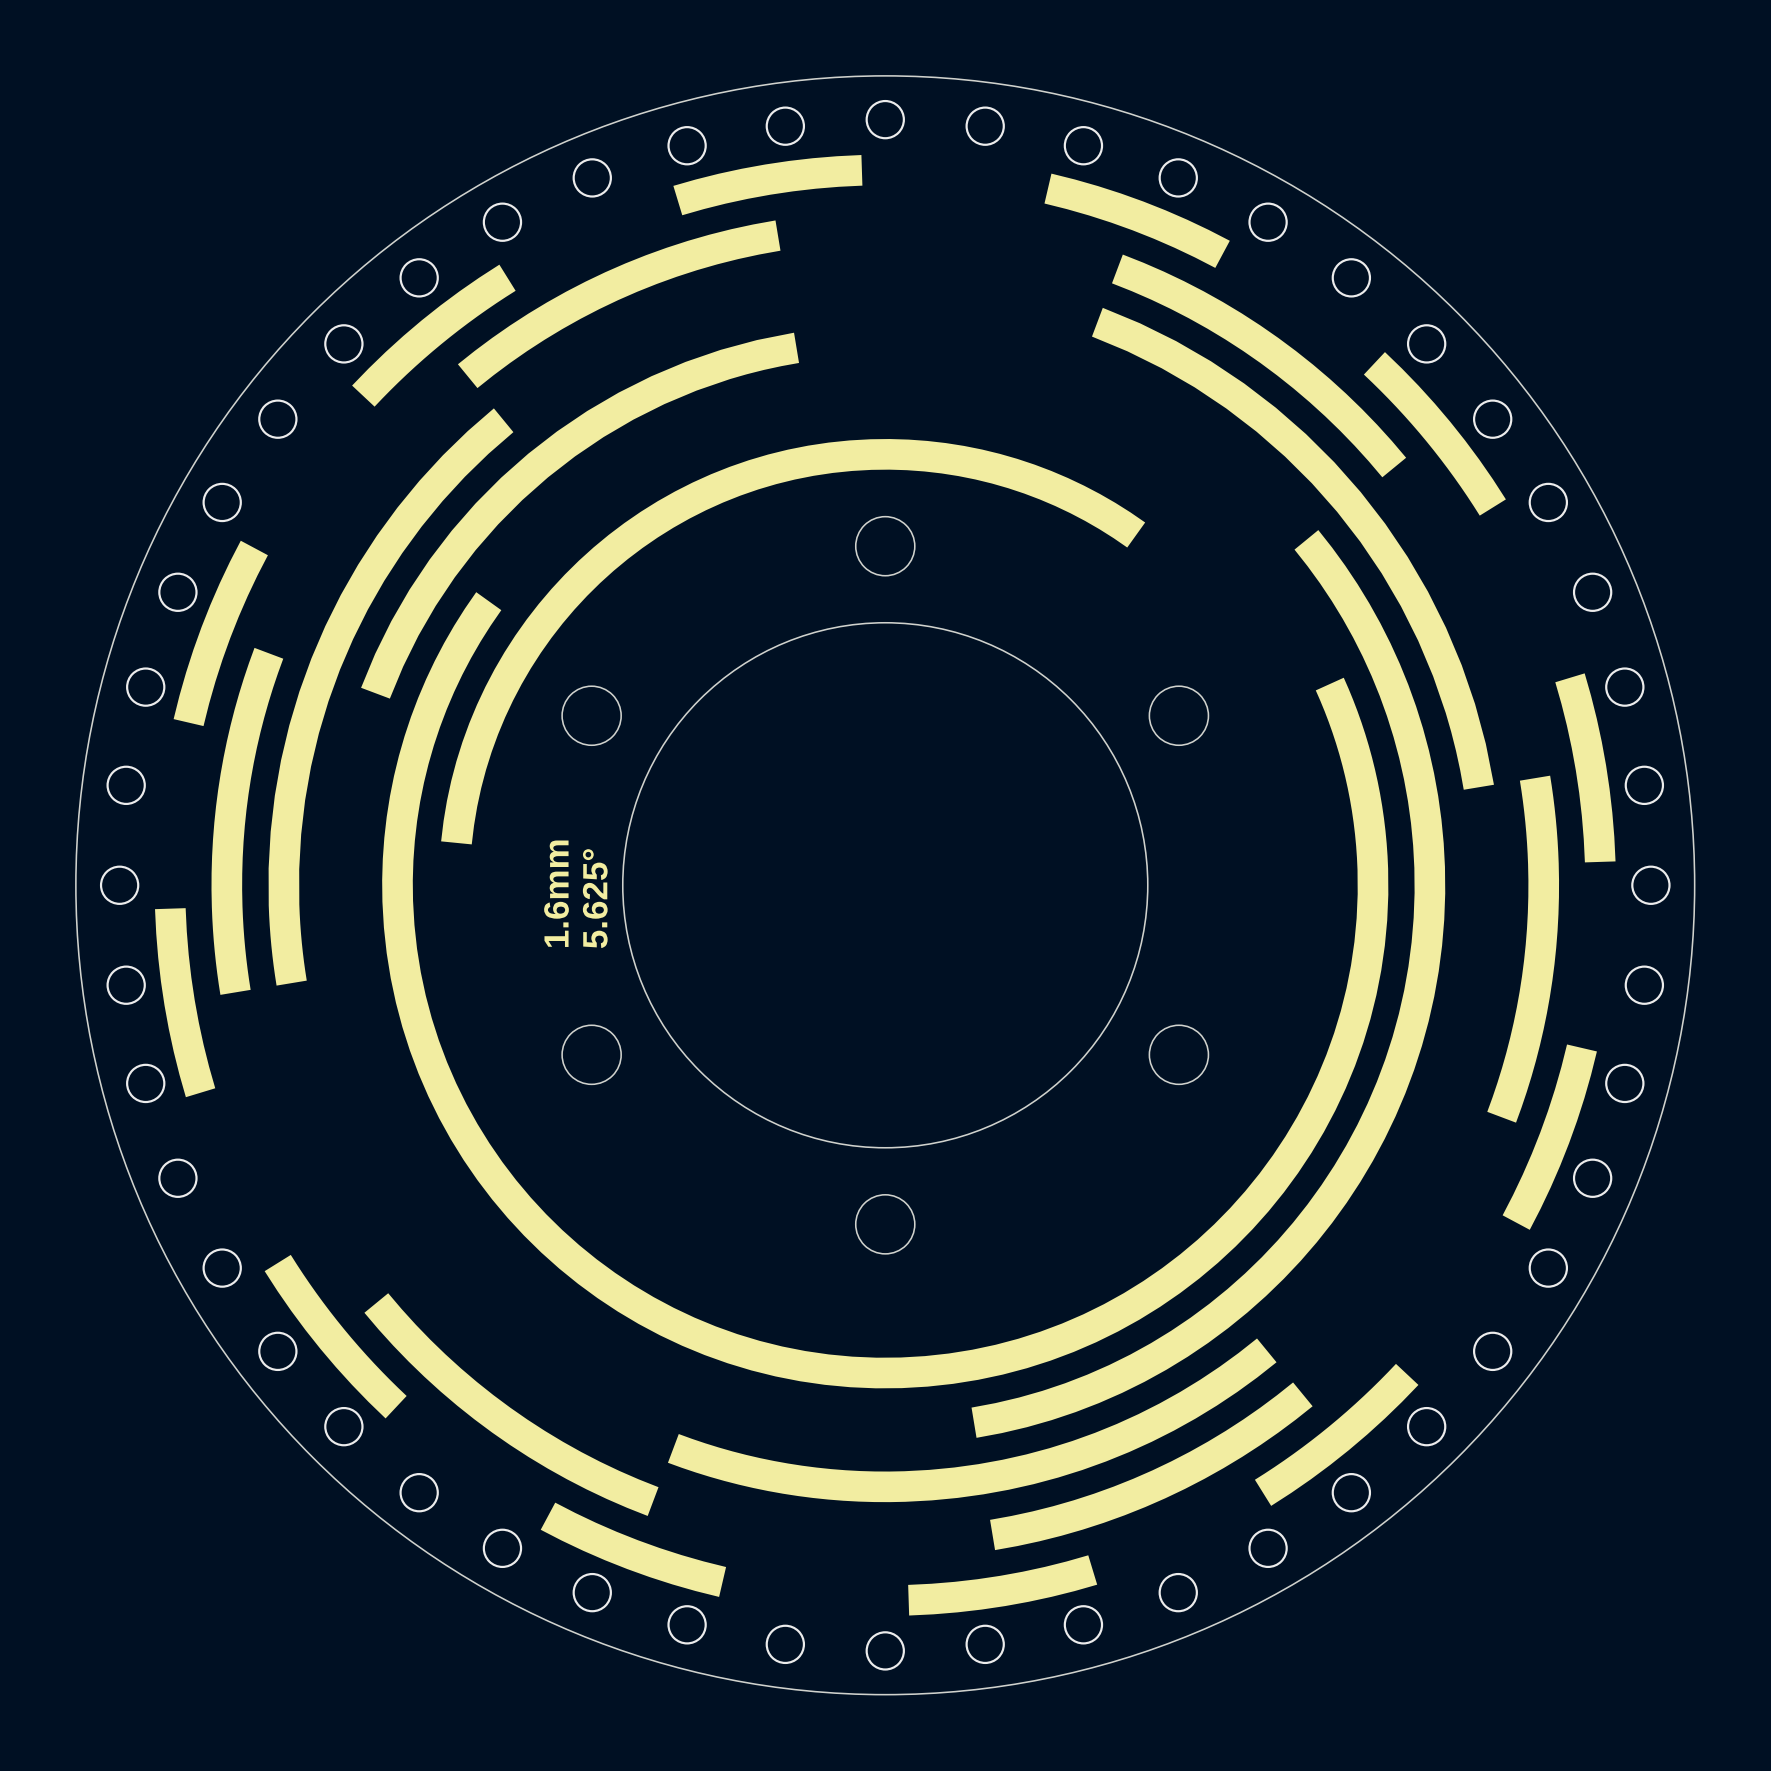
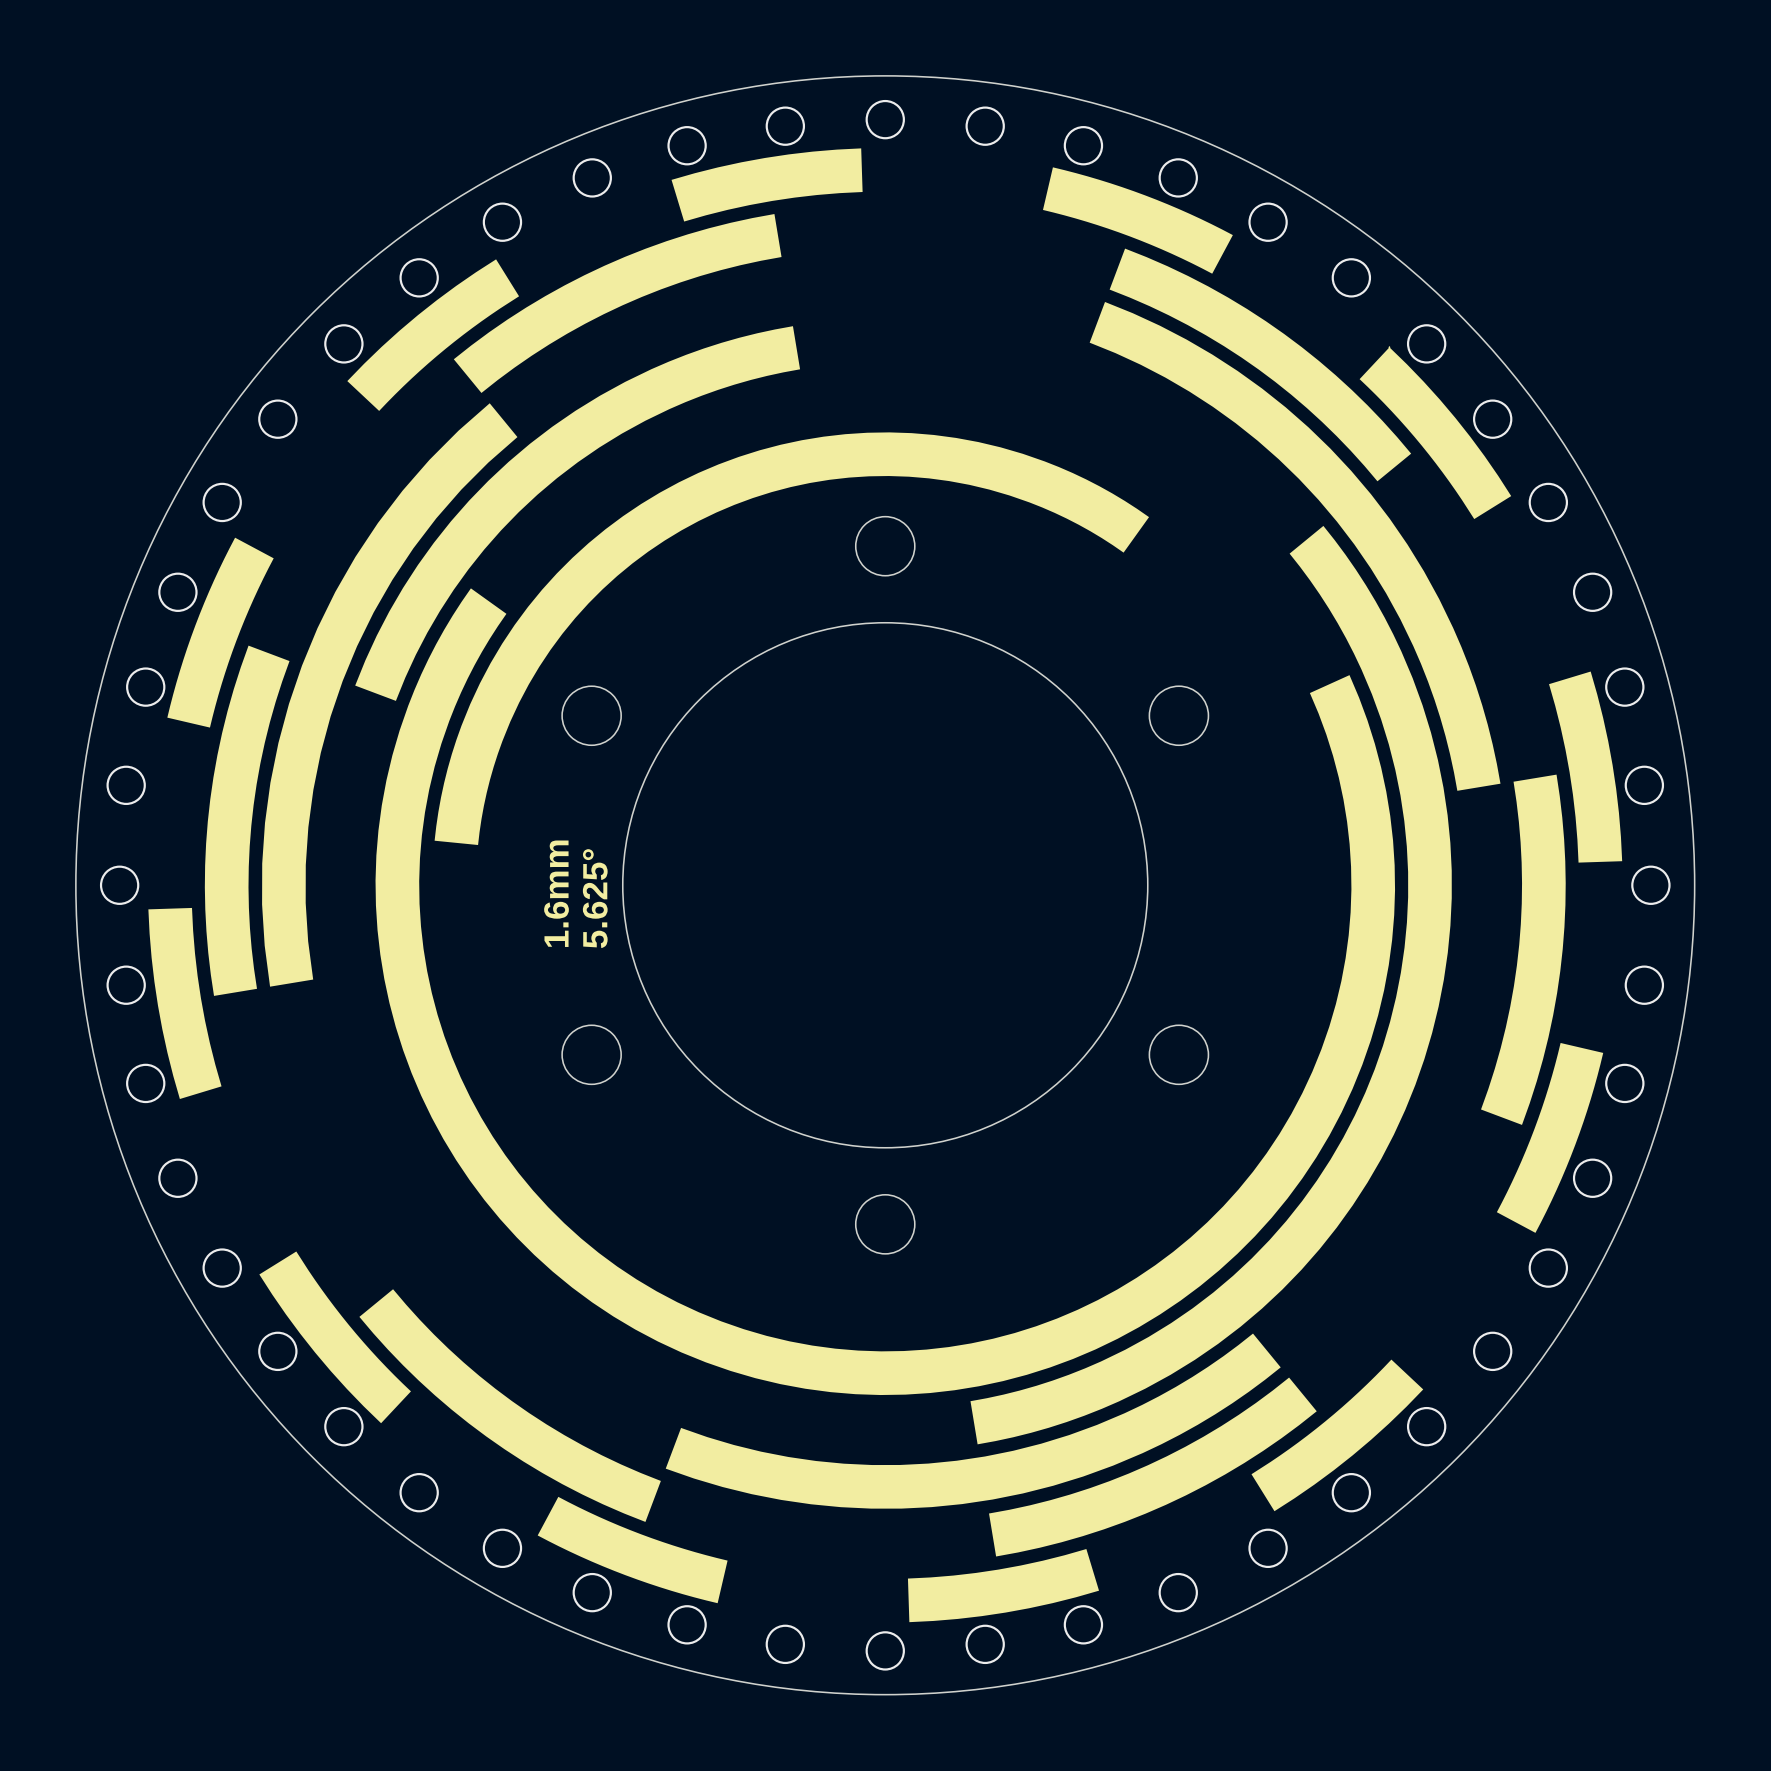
drawing shape: [155, 155, 1616, 1616] -> [148, 148, 1623, 1623]

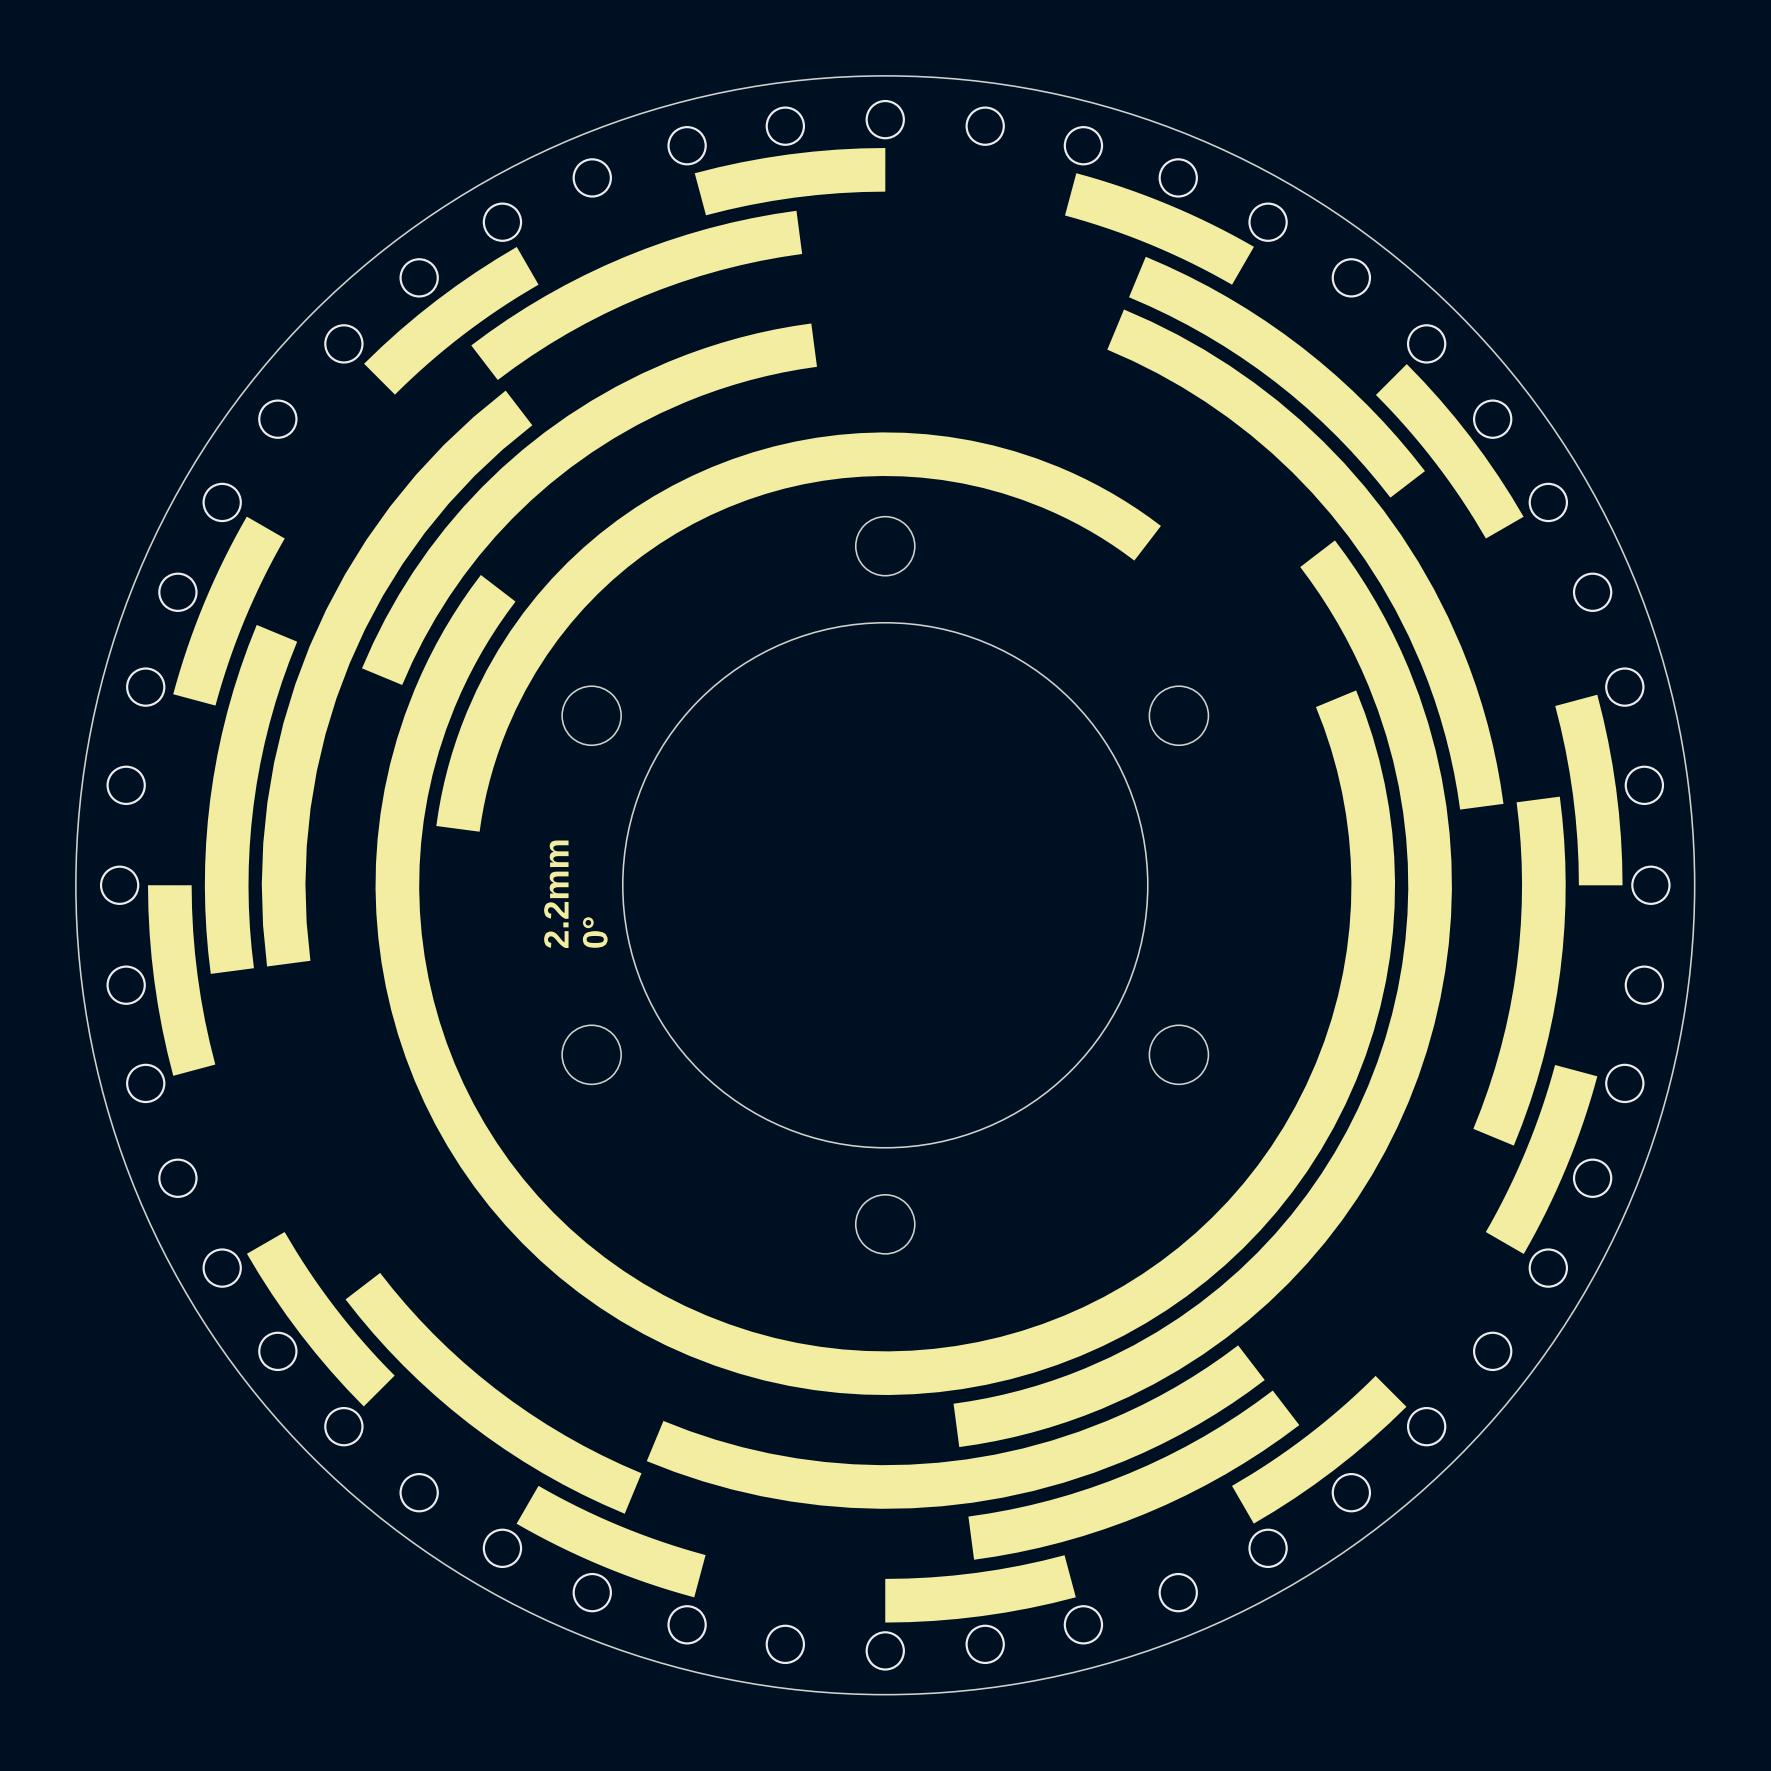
drawing shape: [148, 148, 1623, 1623] -> [147, 147, 1623, 1623]
text: 1.6mm (556, 893) -> 2.2mm (556, 894)
text: 5.625° (595, 898) -> 0° (595, 932)

